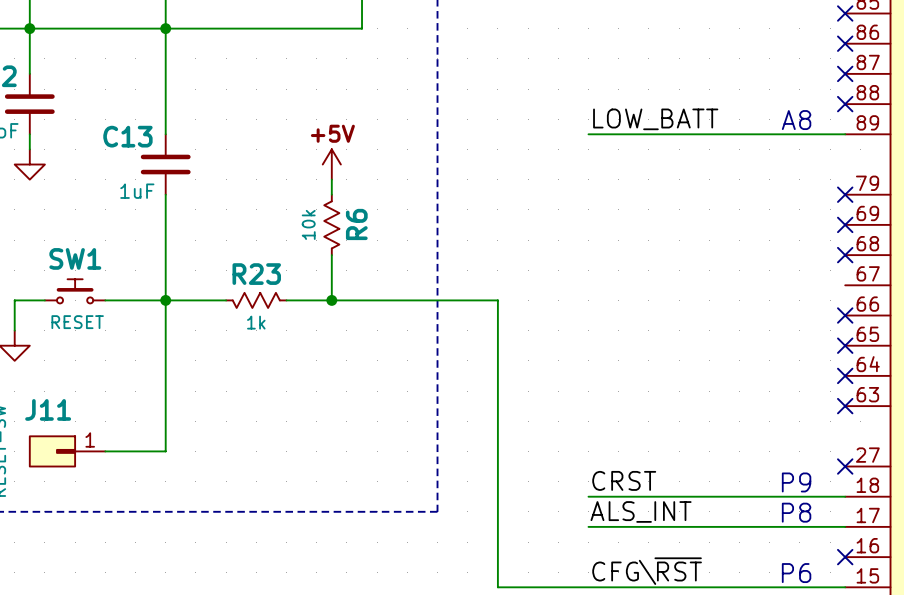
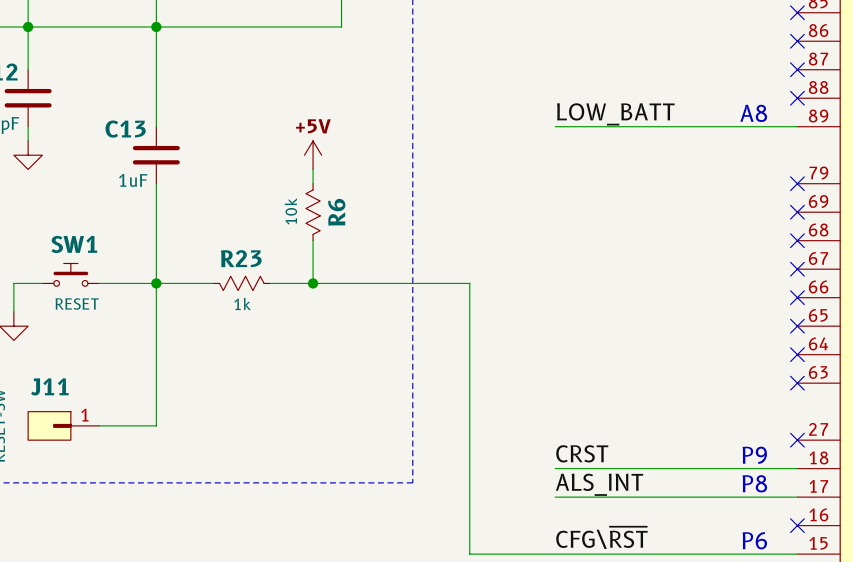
no-connect mark: none -> (797, 269)

